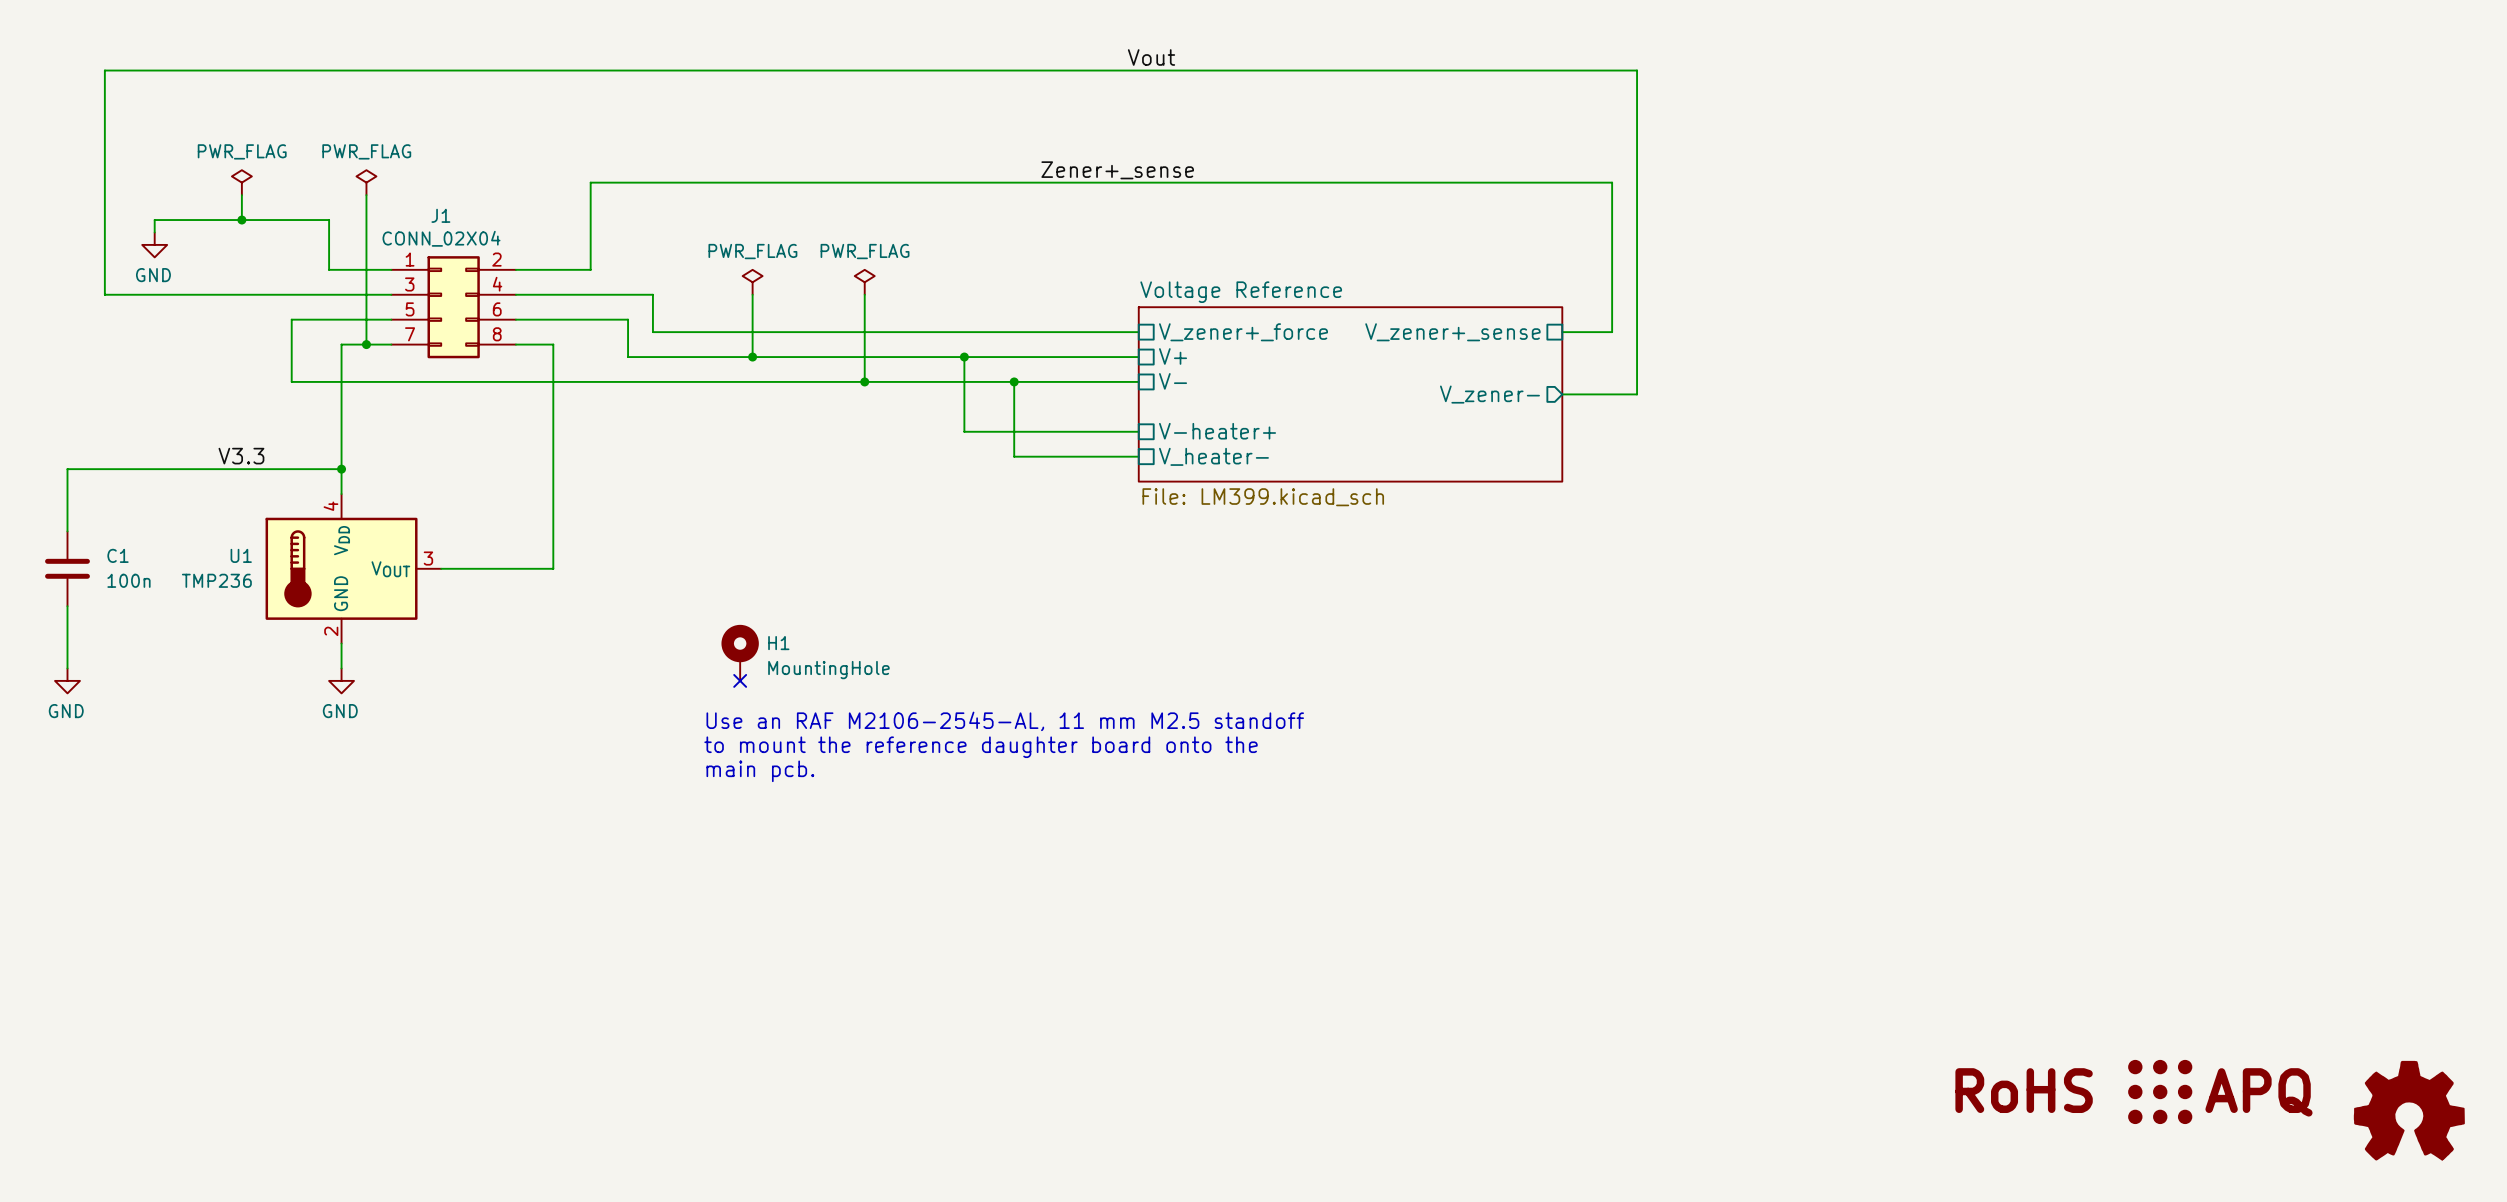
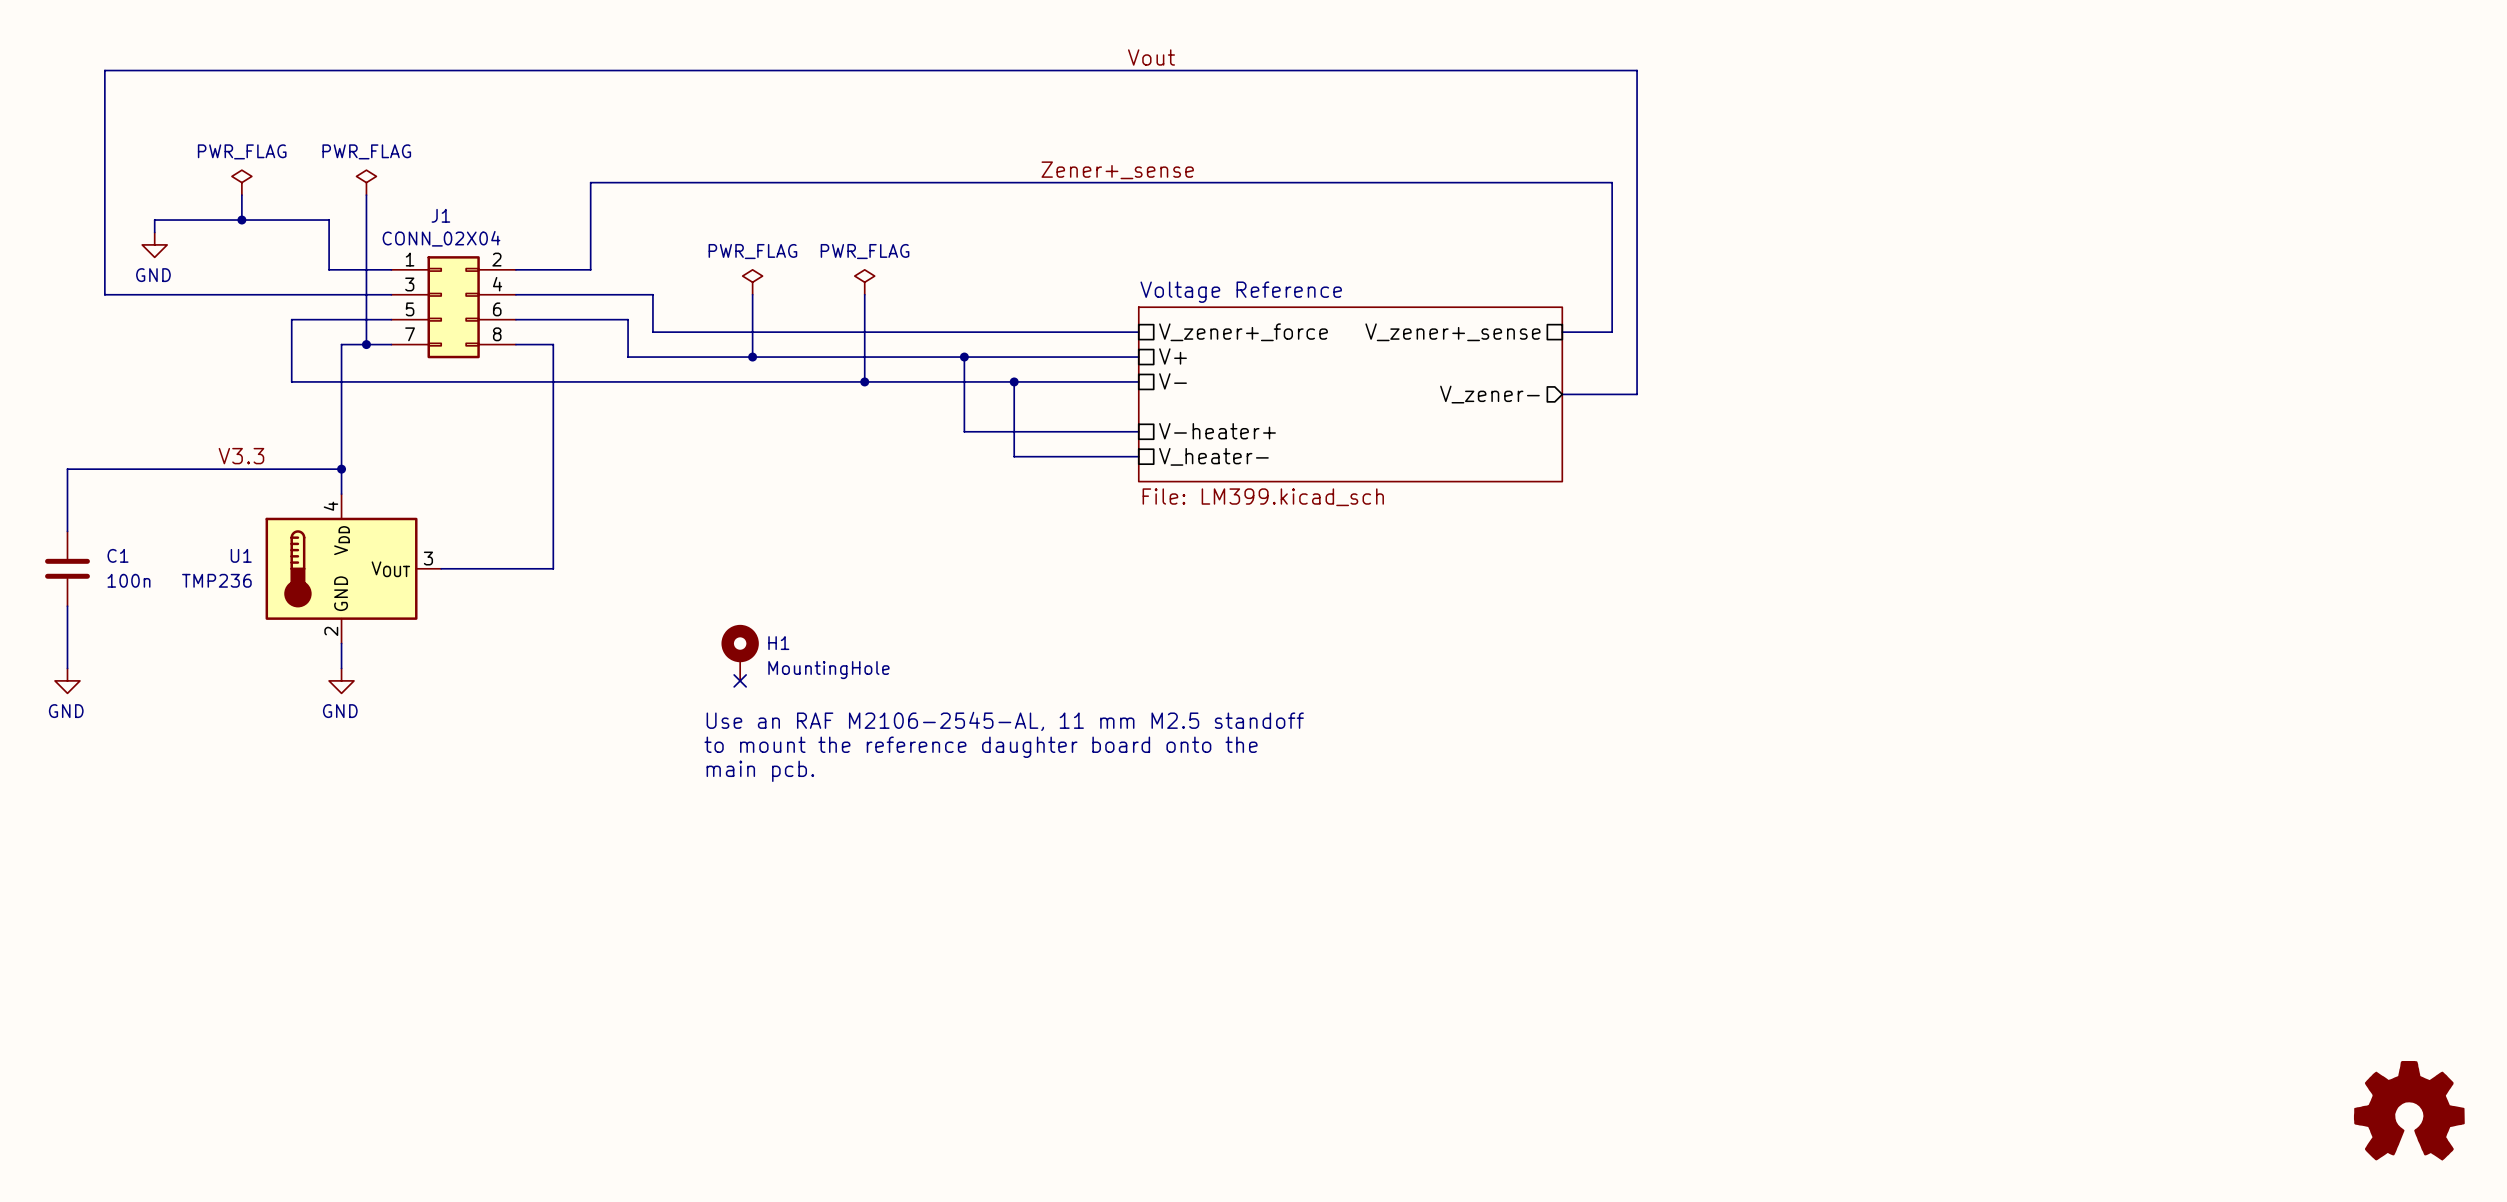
power symbol: (2024, 1090) -> none
power symbol: (2160, 1091) -> none

